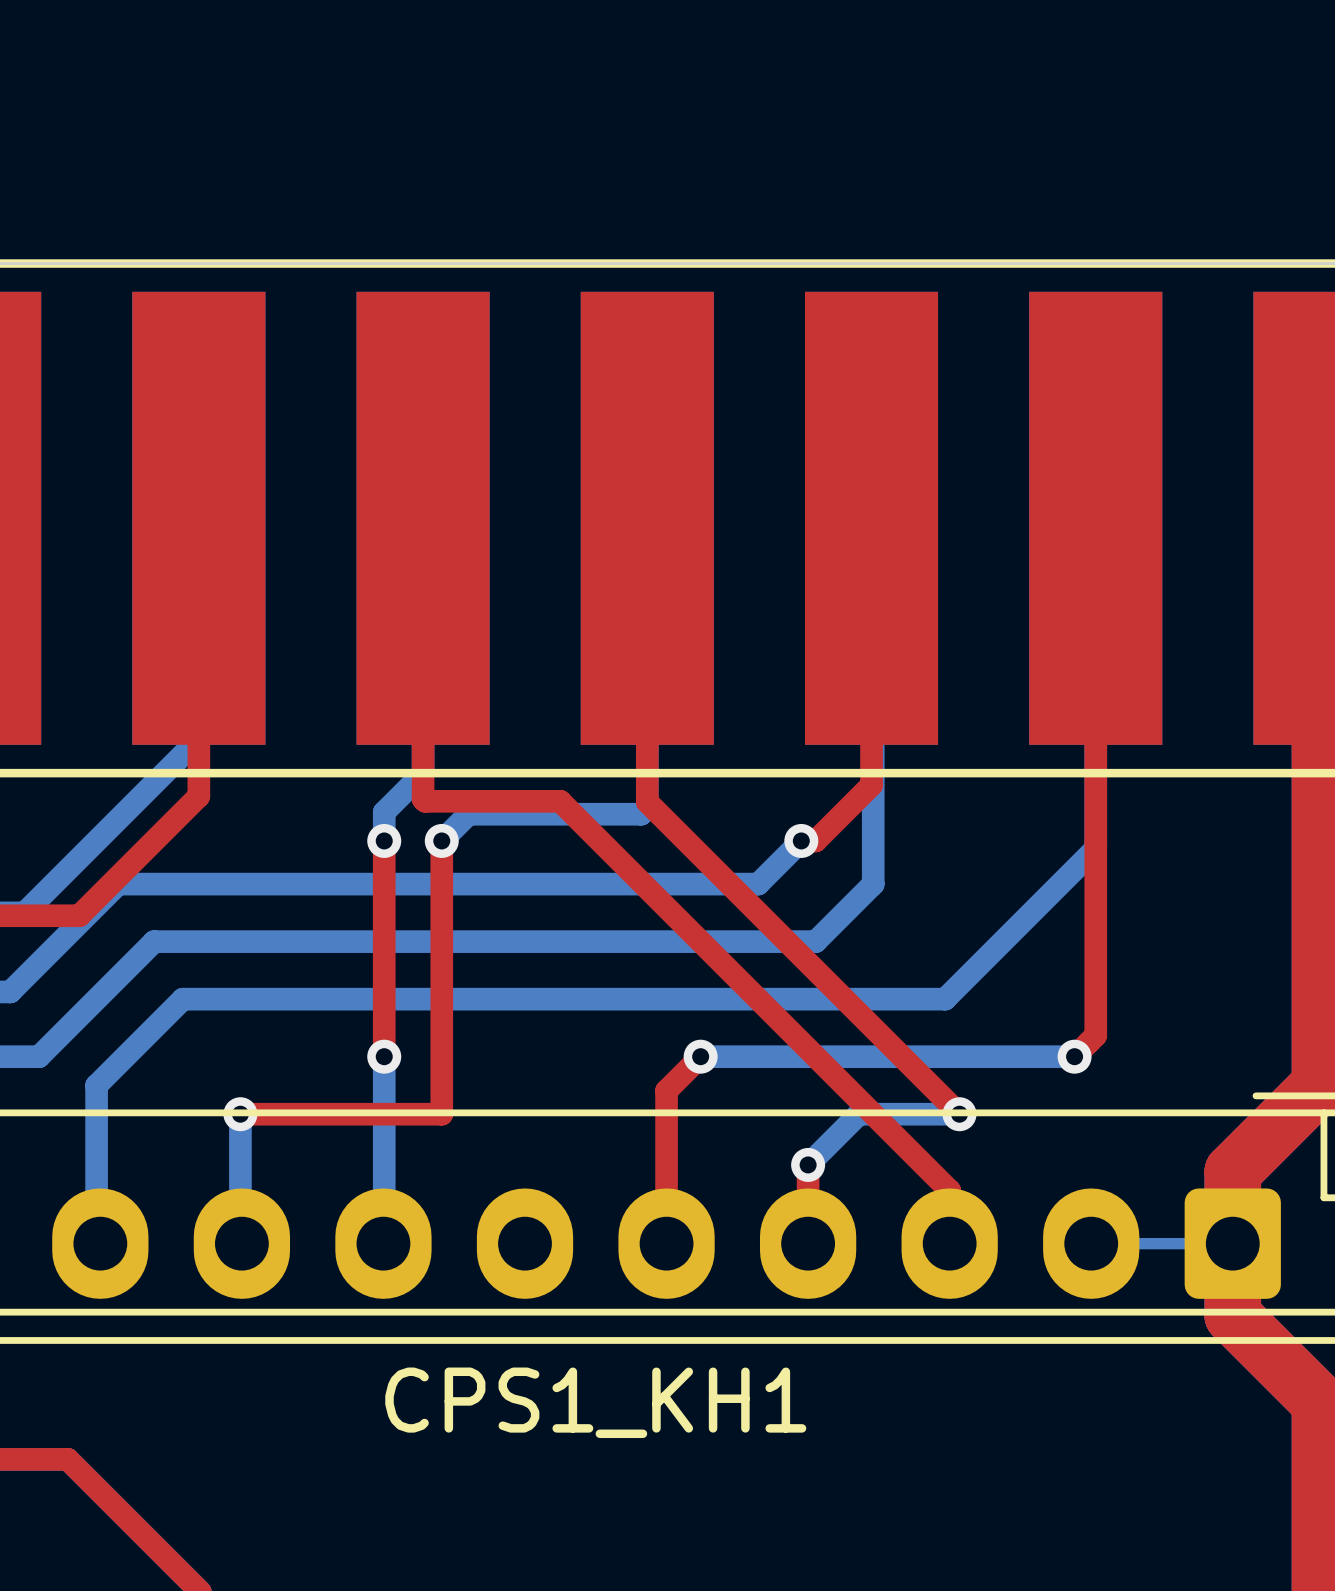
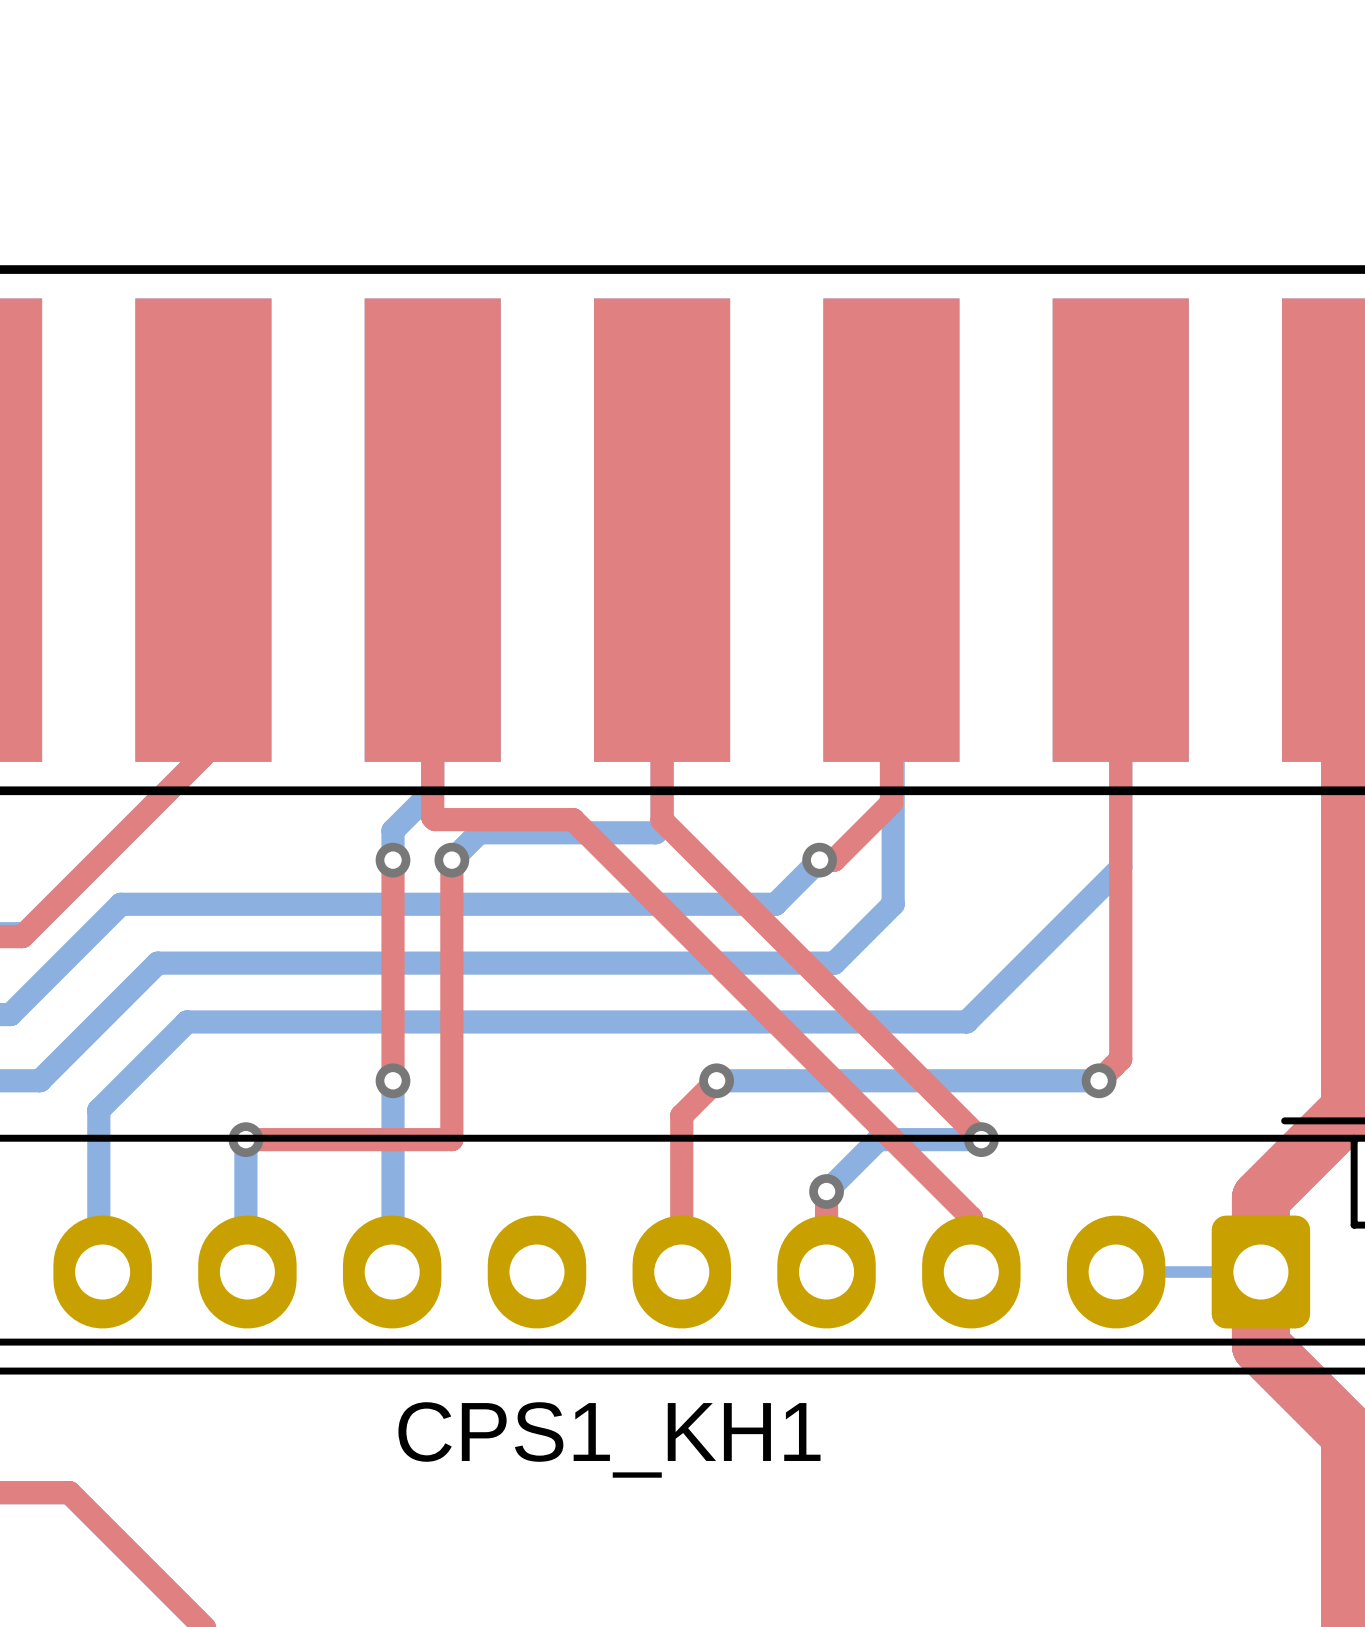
top track: (198, 738) (198, 796) (79, 915) (21, 915) -> (203, 755) (22, 936)

